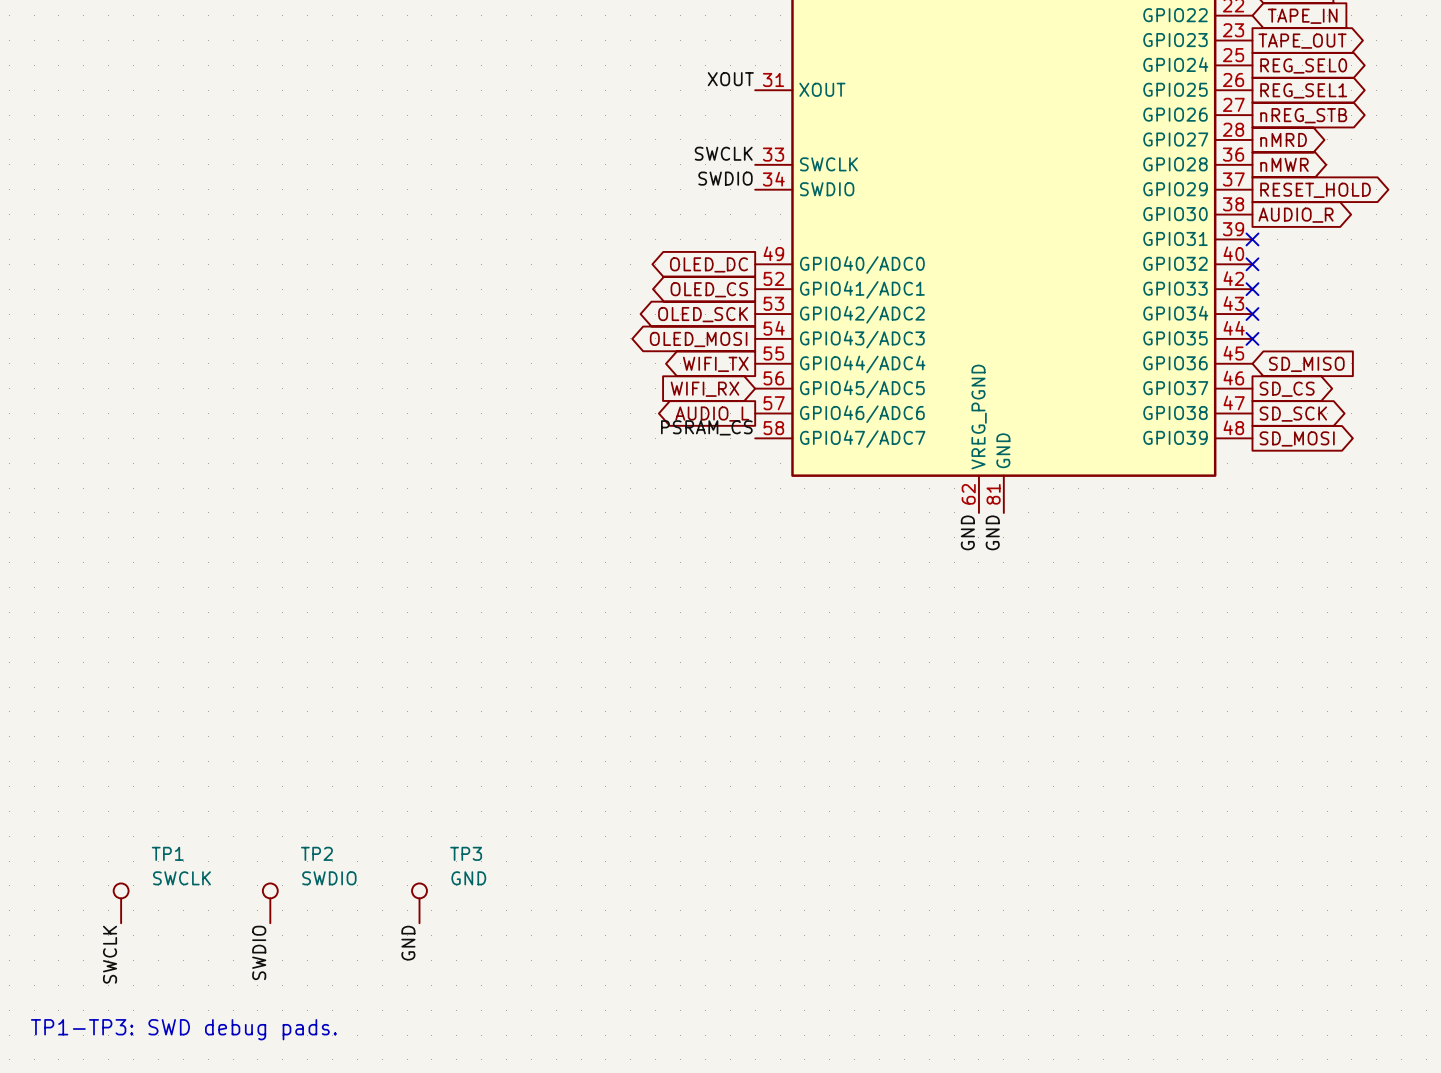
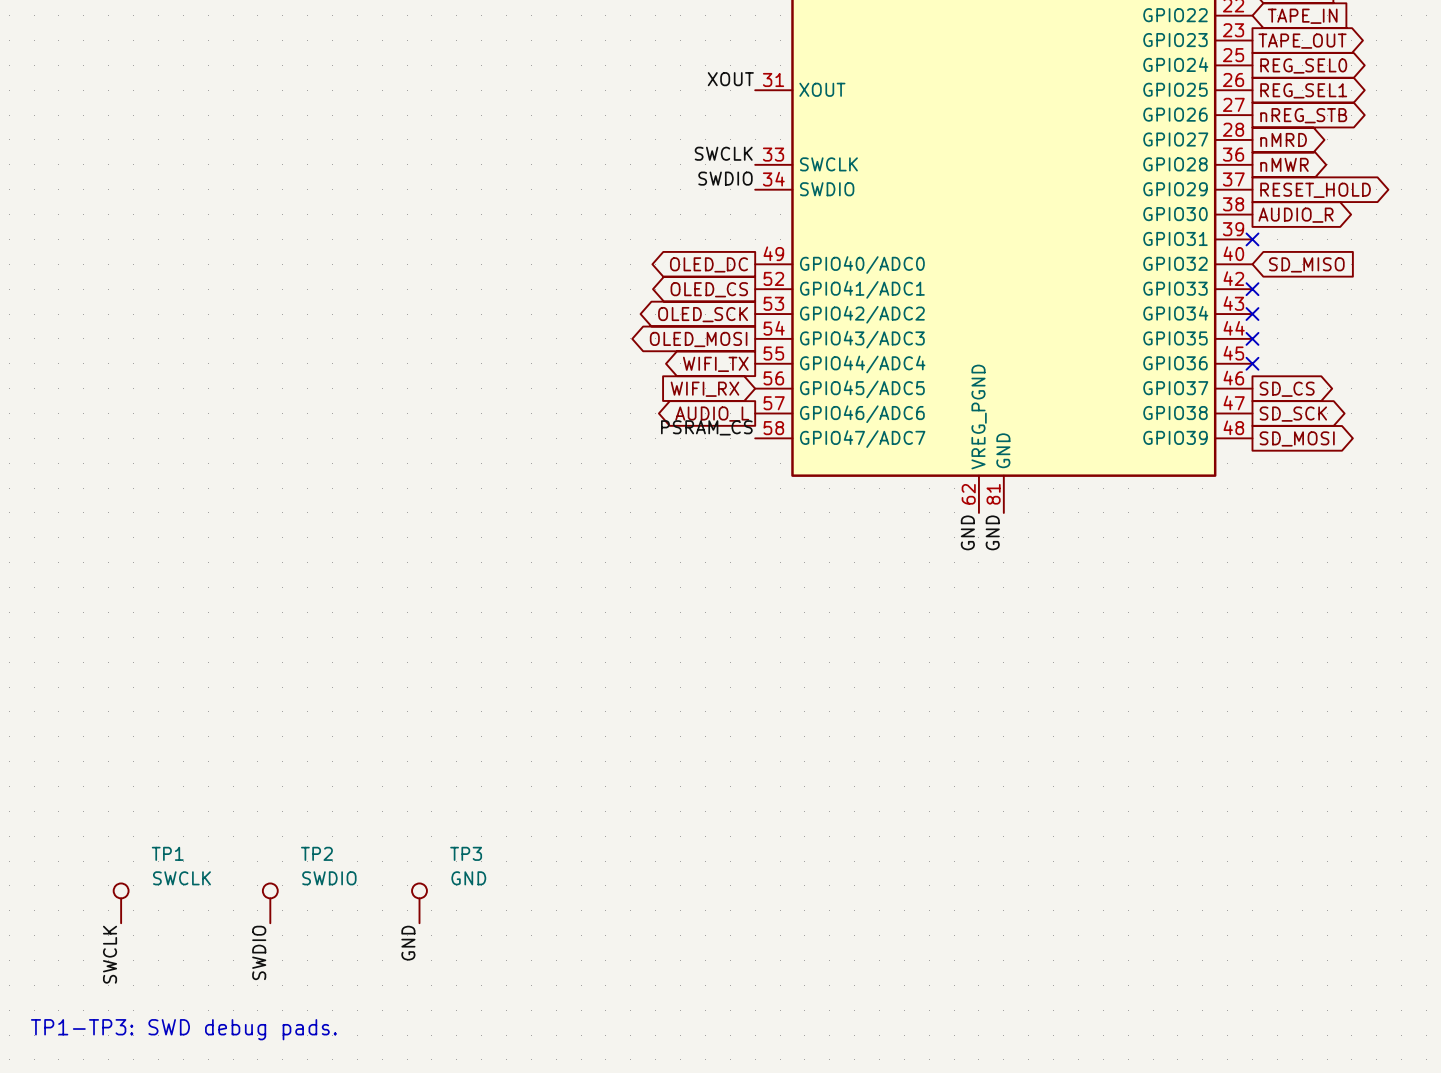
no-connect mark: (1252, 264) -> none
no-connect mark: none -> (1252, 363)
global label position: SD_MISO (1306, 364) -> SD_MISO (1306, 264)

